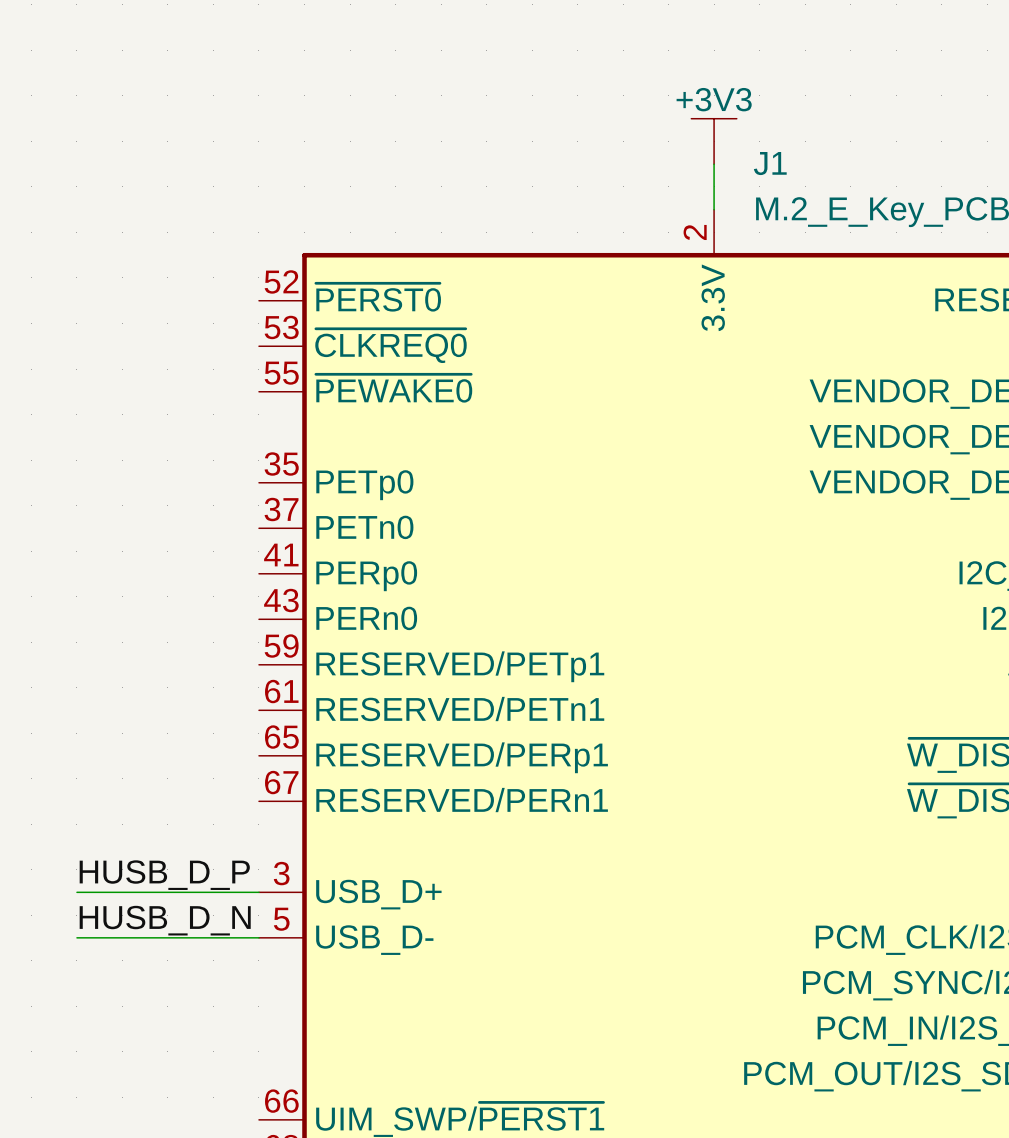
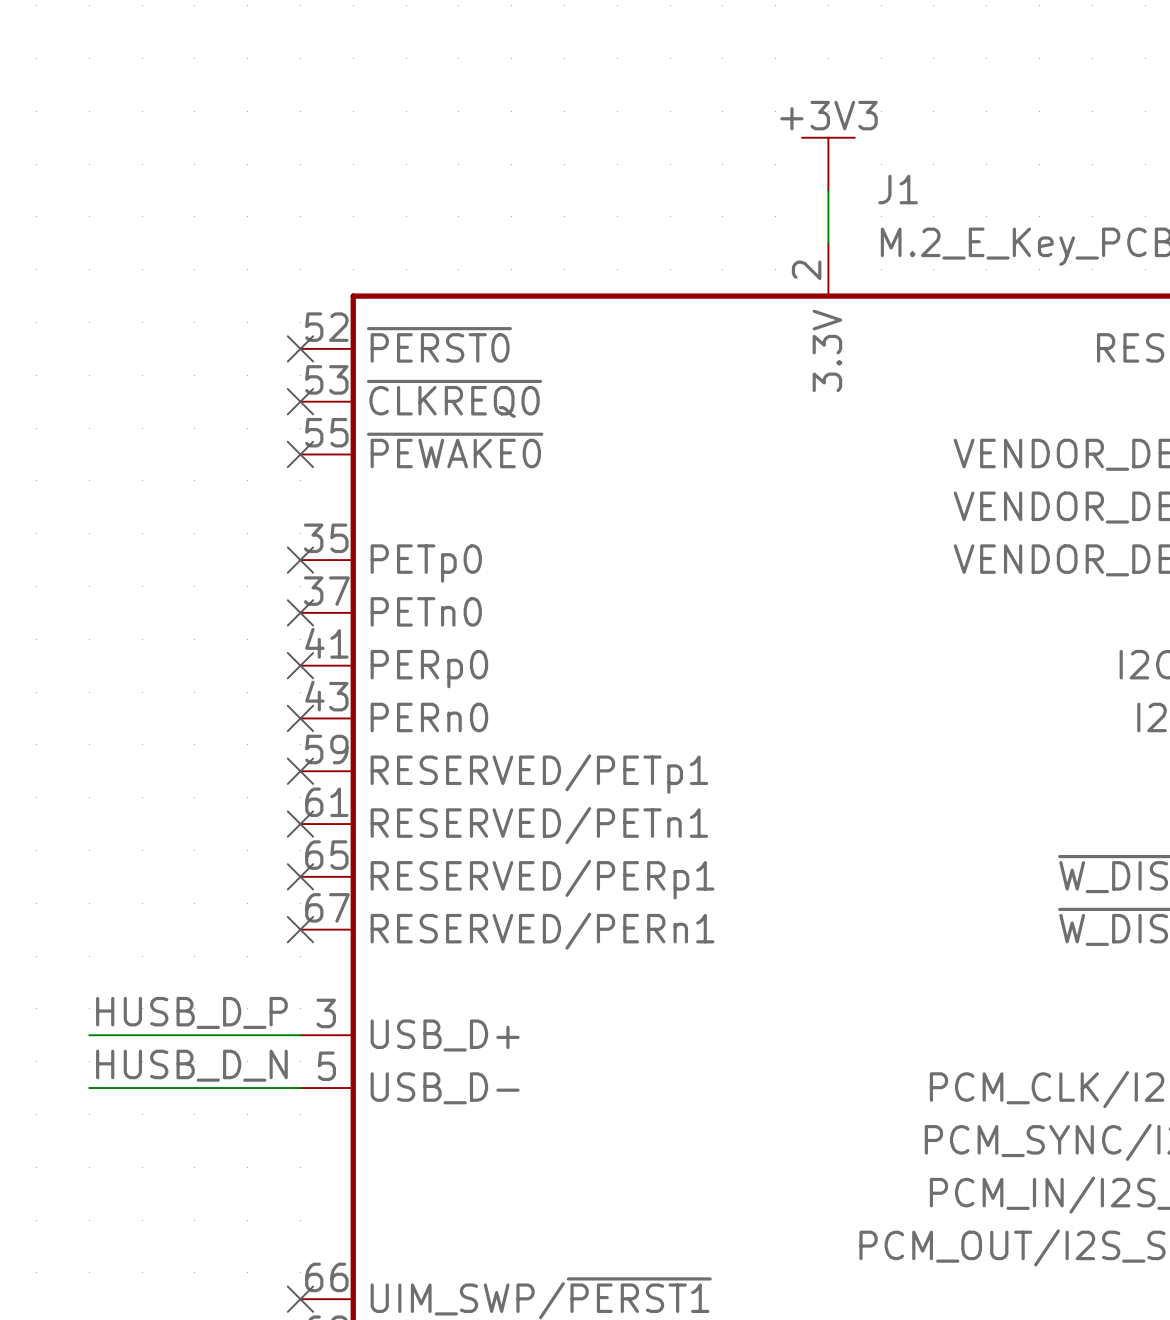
no-connect mark: none -> (300, 348)
no-connect mark: none -> (300, 401)
no-connect mark: none -> (300, 454)
no-connect mark: none -> (300, 560)
no-connect mark: none -> (300, 612)
no-connect mark: none -> (300, 665)
no-connect mark: none -> (300, 718)
no-connect mark: none -> (300, 771)
no-connect mark: none -> (300, 824)
no-connect mark: none -> (300, 876)
no-connect mark: none -> (300, 929)
no-connect mark: none -> (300, 1299)

